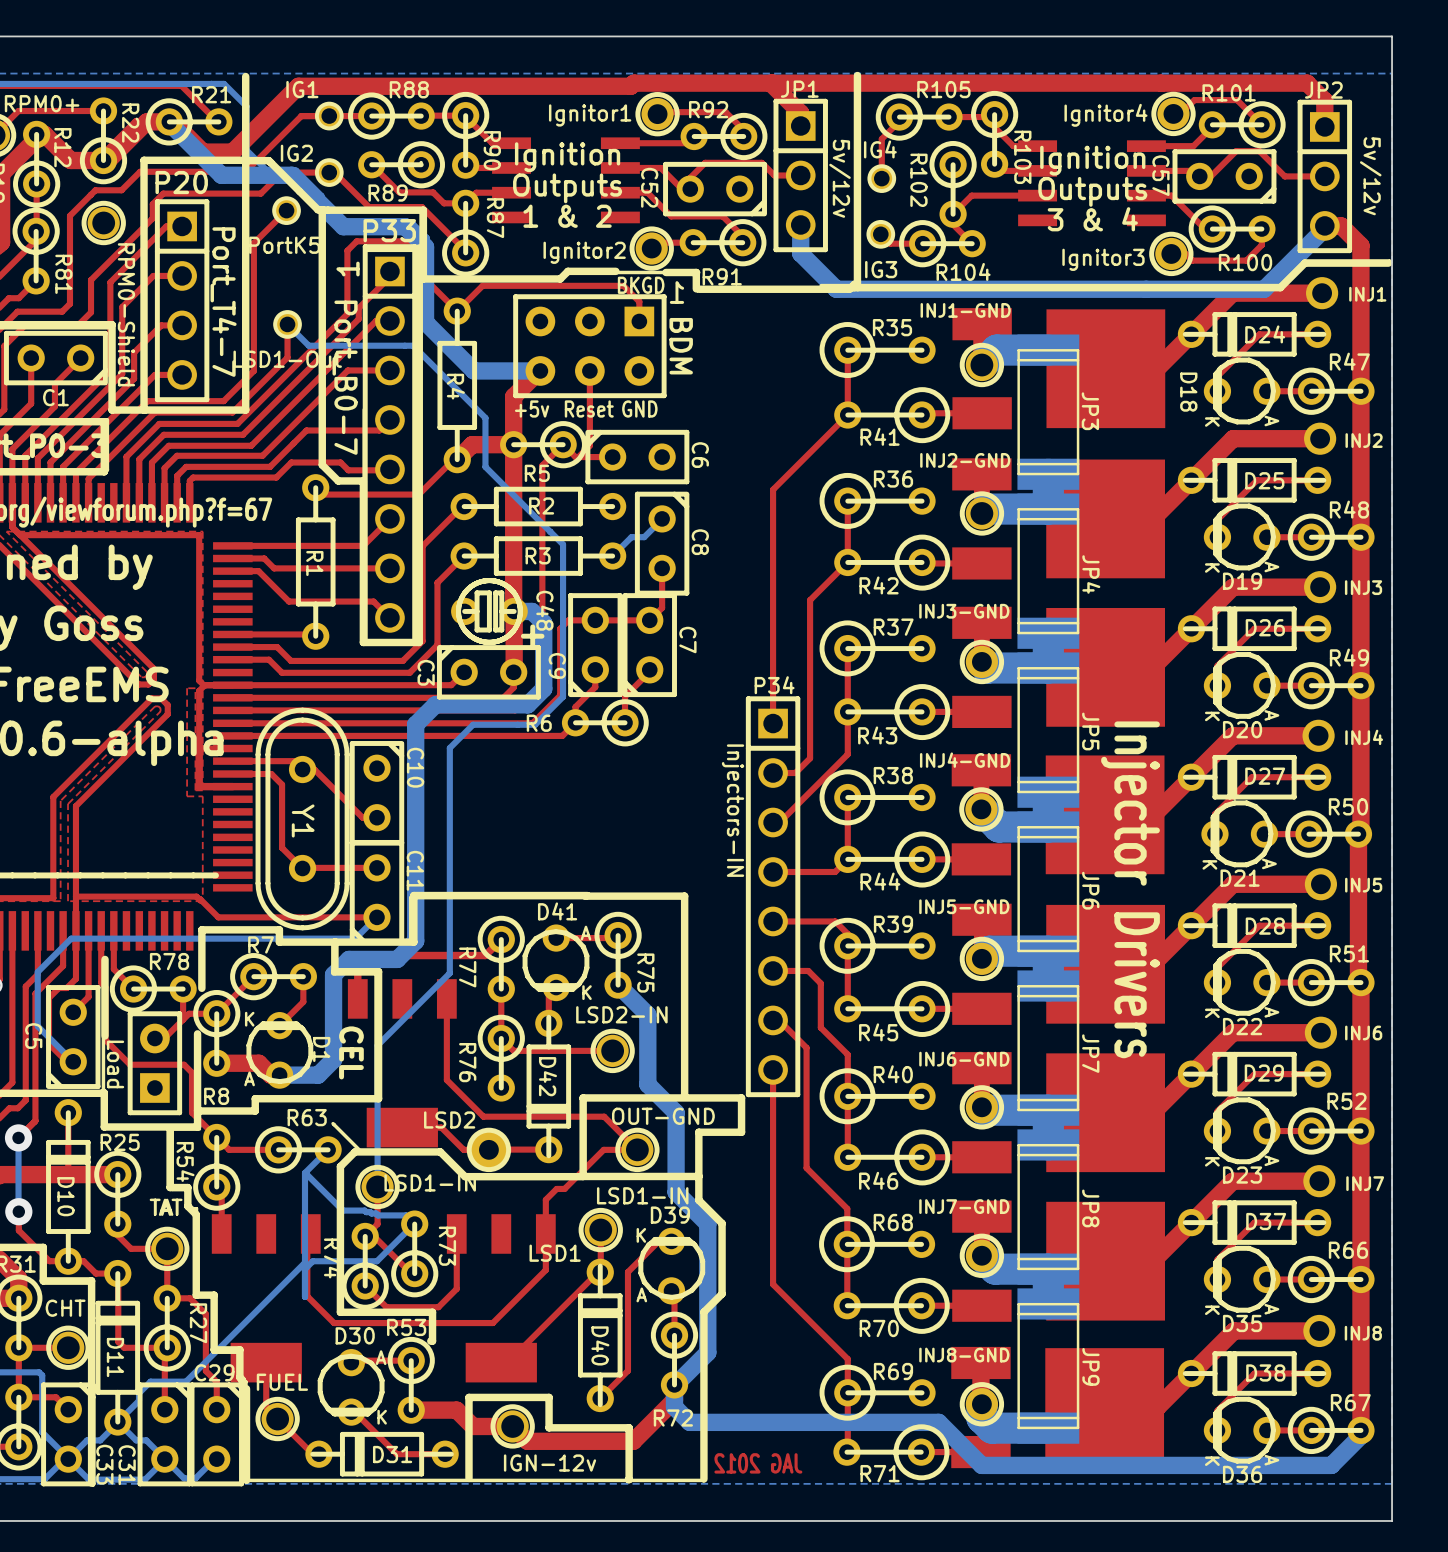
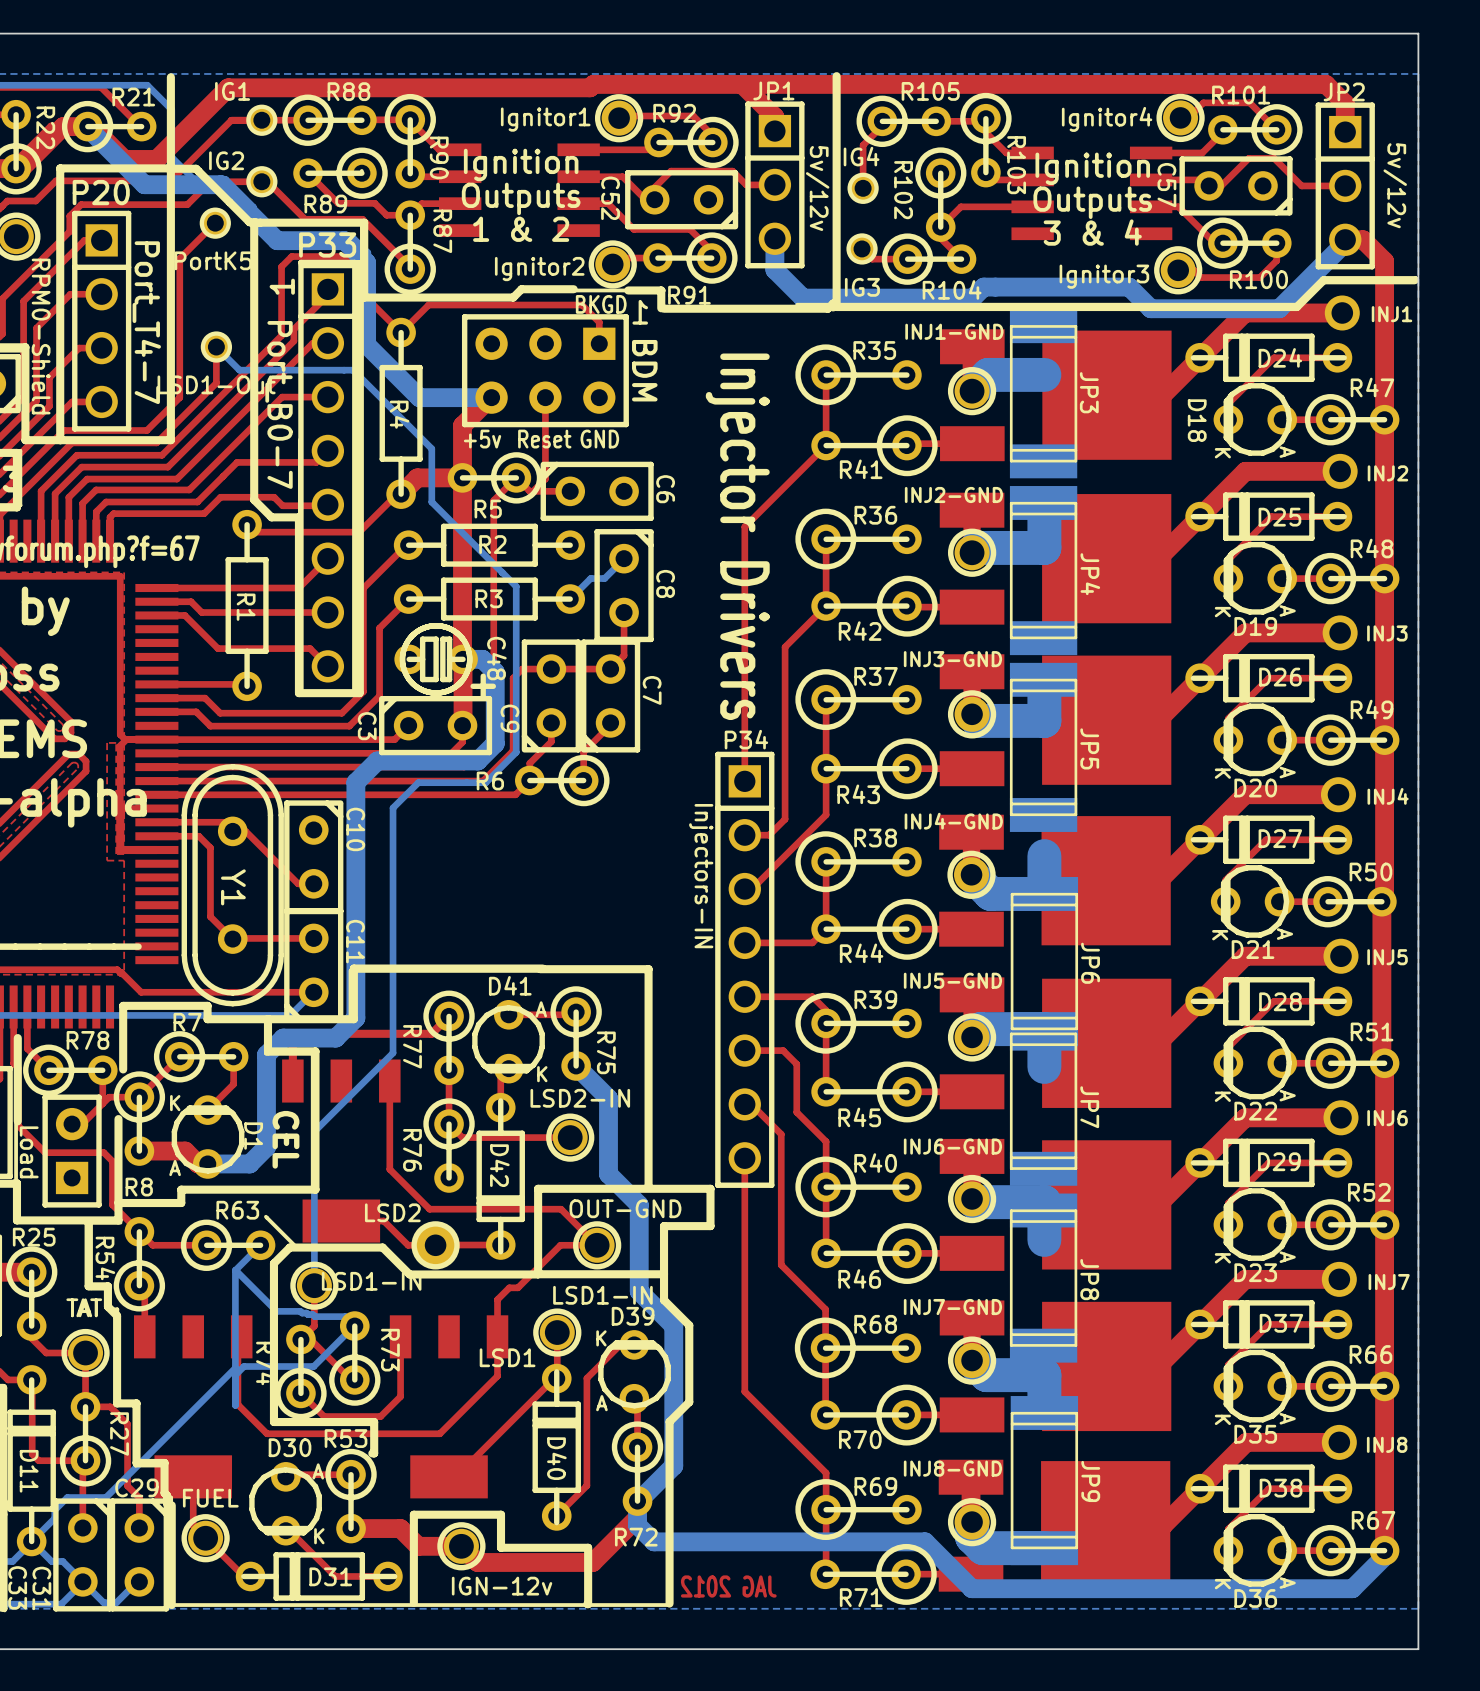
bottom track: (826, 279) (836, 289) (1146, 289) -> (803, 298) (972, 298) (983, 287) (1129, 287) (1150, 308)
JP3 position: (1048, 412) -> (1043, 393)
text: none -> Injector Drivers (737, 536)
JP4 position: (1048, 571) -> (1043, 570)
JP5 position: (1048, 730) -> (1043, 747)
text: Injector Drivers (1130, 889) -> none
JP7 position: (1048, 1048) -> (1043, 1101)
JP8 position: (1048, 1207) -> (1043, 1278)

